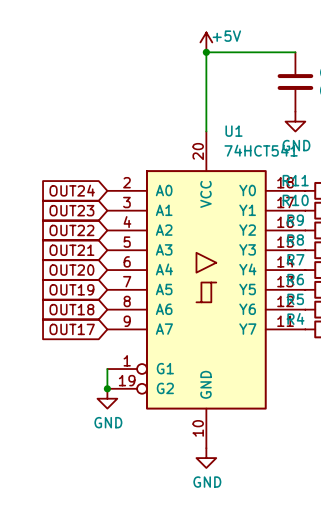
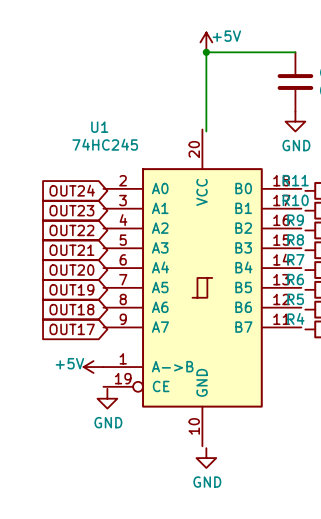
U1 symbol: [107, 131, 306, 449] -> [103, 129, 302, 447]
U1 name position: U1 (233, 131) -> U1 (99, 127)
U1 value: 74HCT541 (261, 150) -> 74HC245 (105, 144)
power symbol: none -> +5V (93, 367)
wire: (107, 369) (107, 388) -> none
junction: (107, 388) -> none

